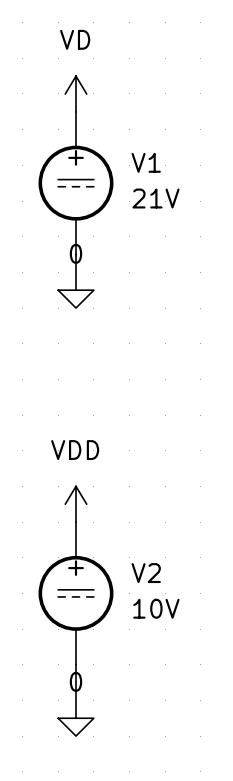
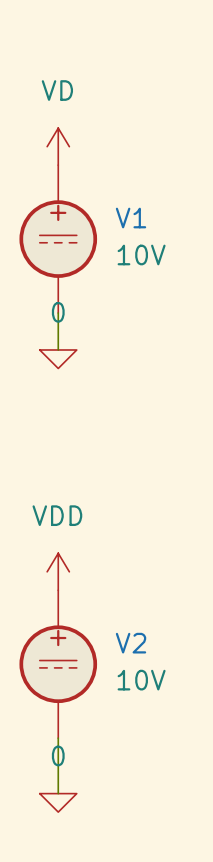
V1 value: 21V (155, 198) -> 10V (141, 254)

